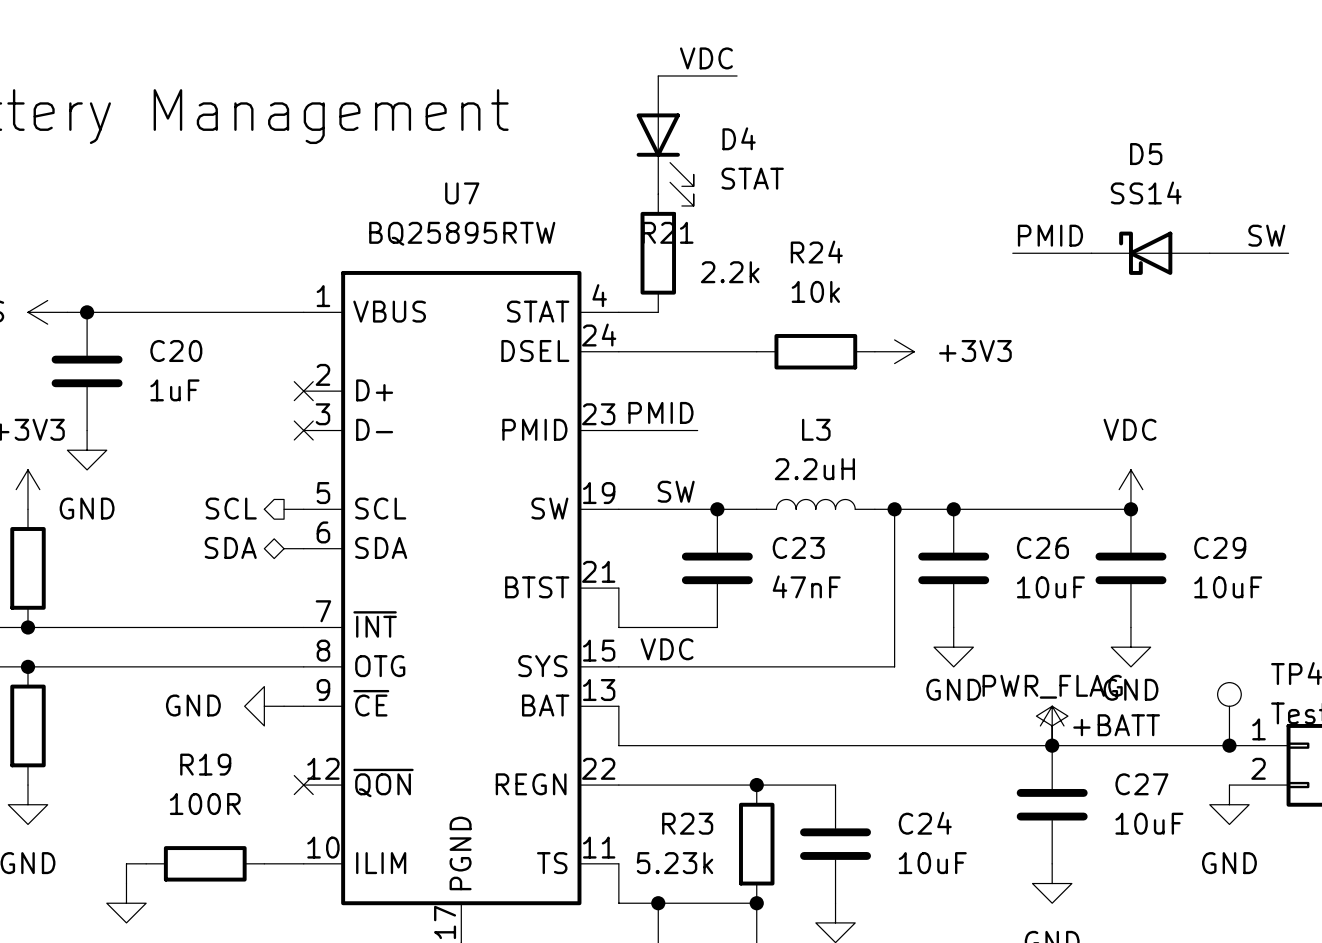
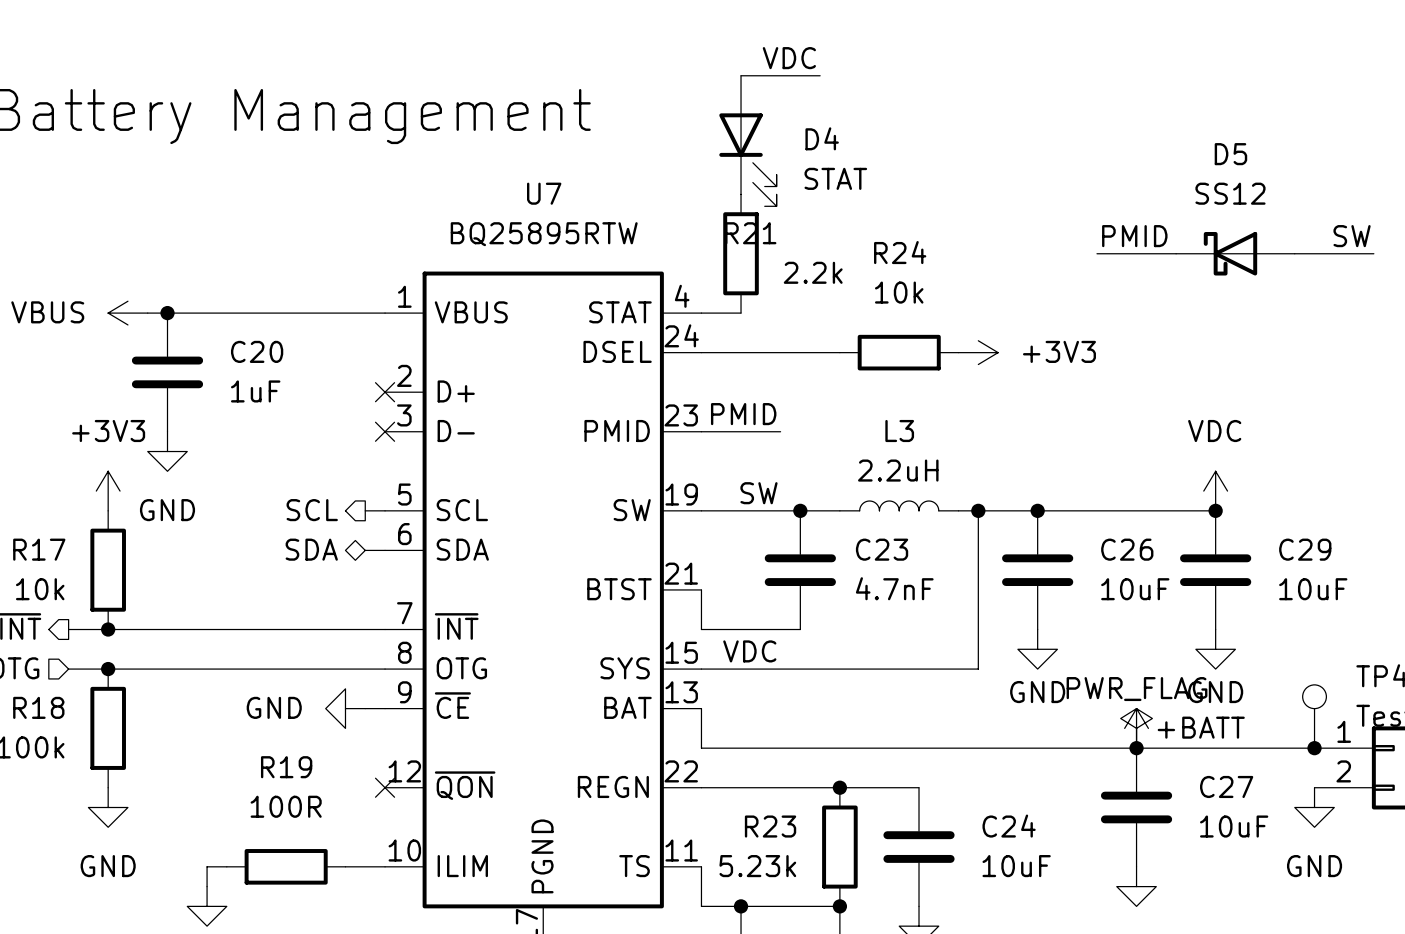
D5 value: SS14 (1146, 192) -> SS12 (1230, 193)
C23 value: 47nF (806, 586) -> 4.7nF (894, 588)

